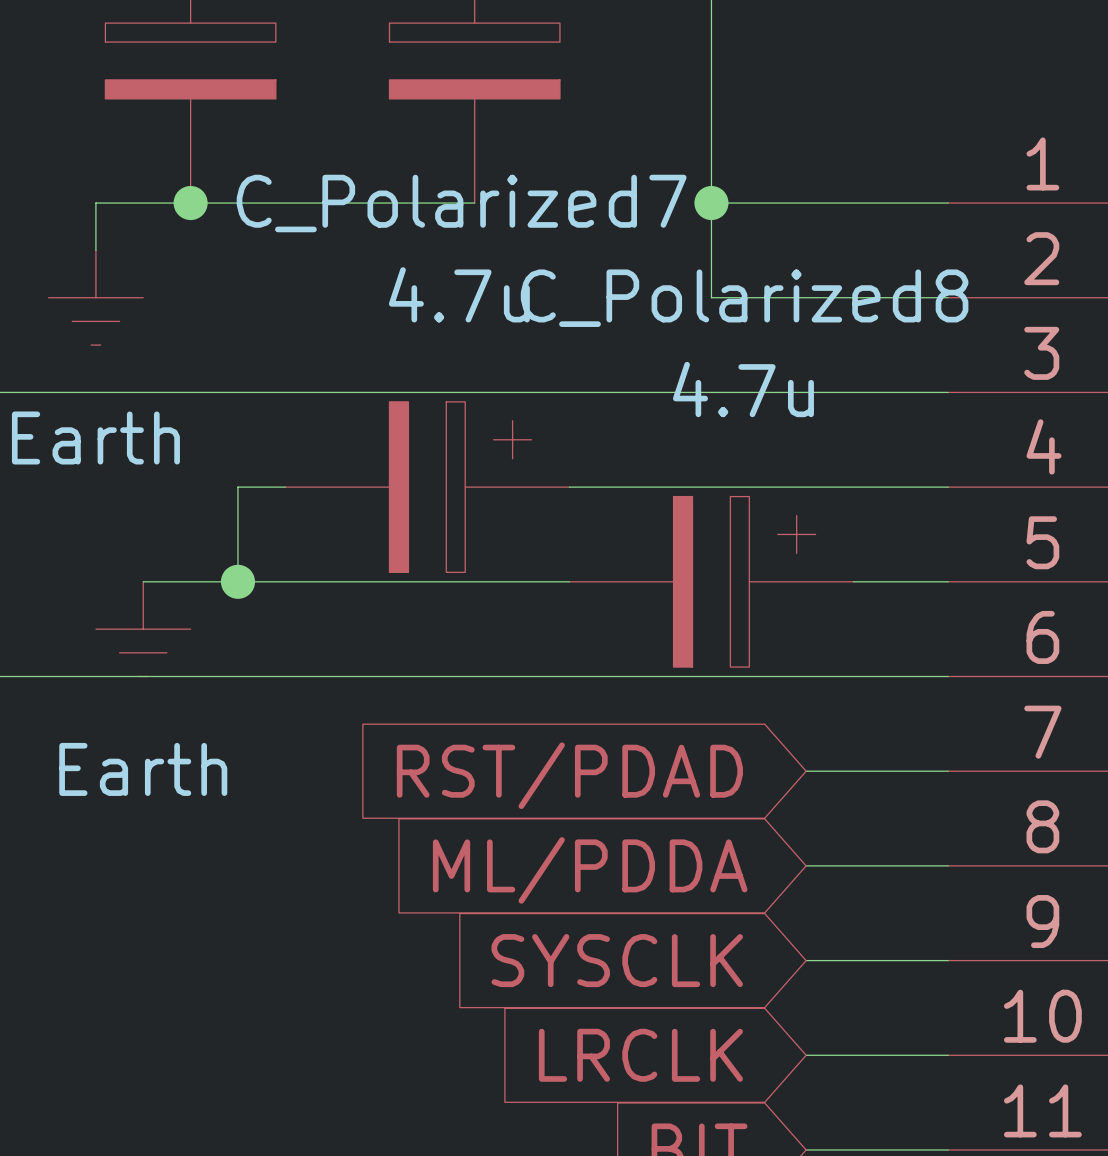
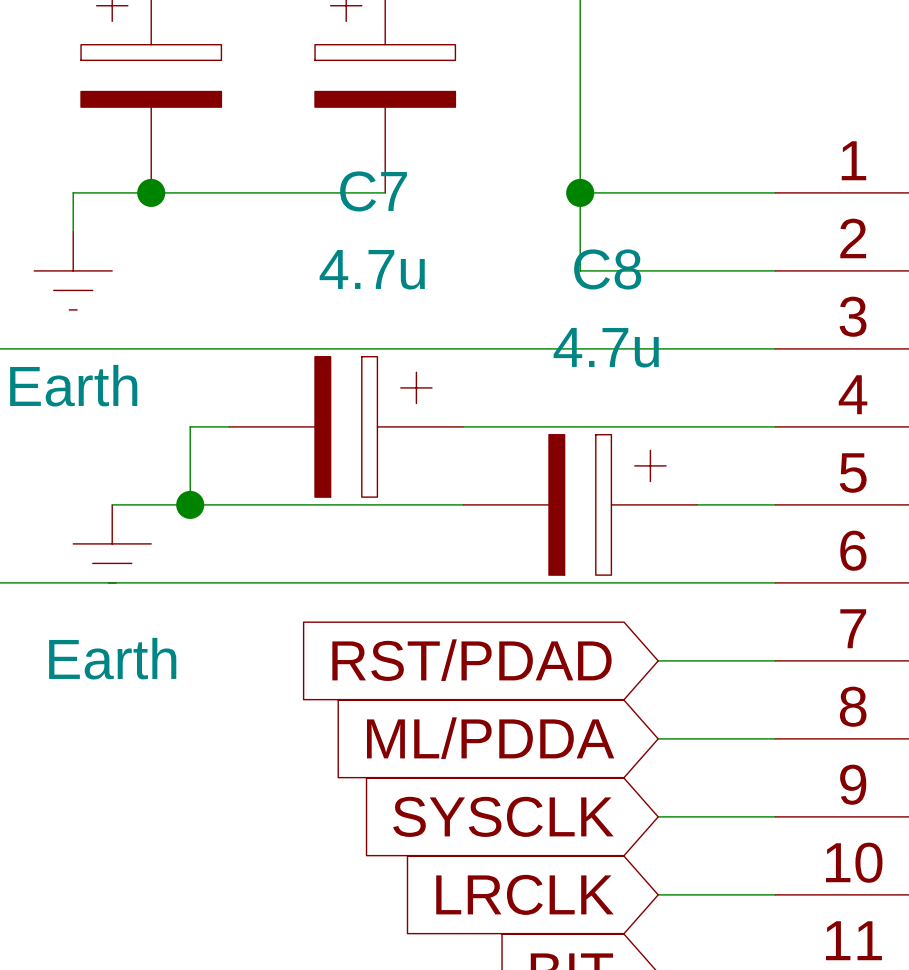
C_Polarized7 name: C_Polarized7 (461, 203) -> C7 (373, 191)
C_Polarized8 name: C_Polarized8 (744, 298) -> C8 (607, 269)

